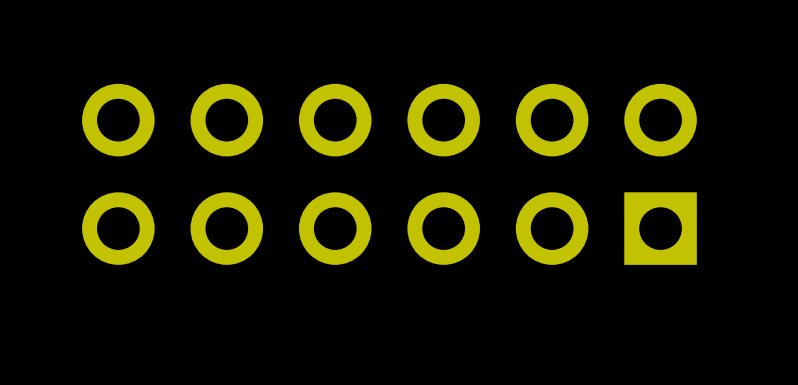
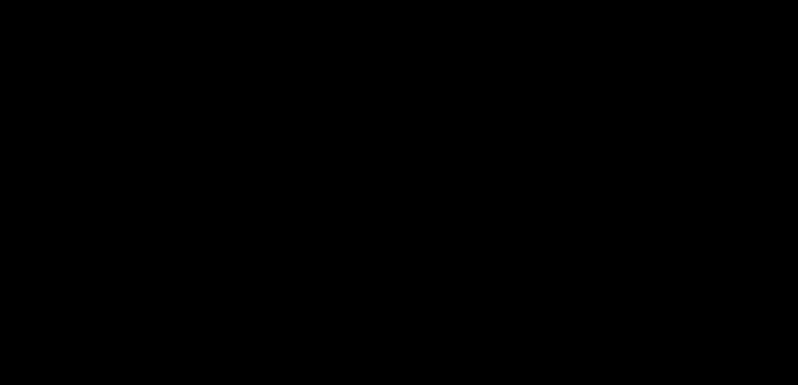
part: (389, 174) -> none

